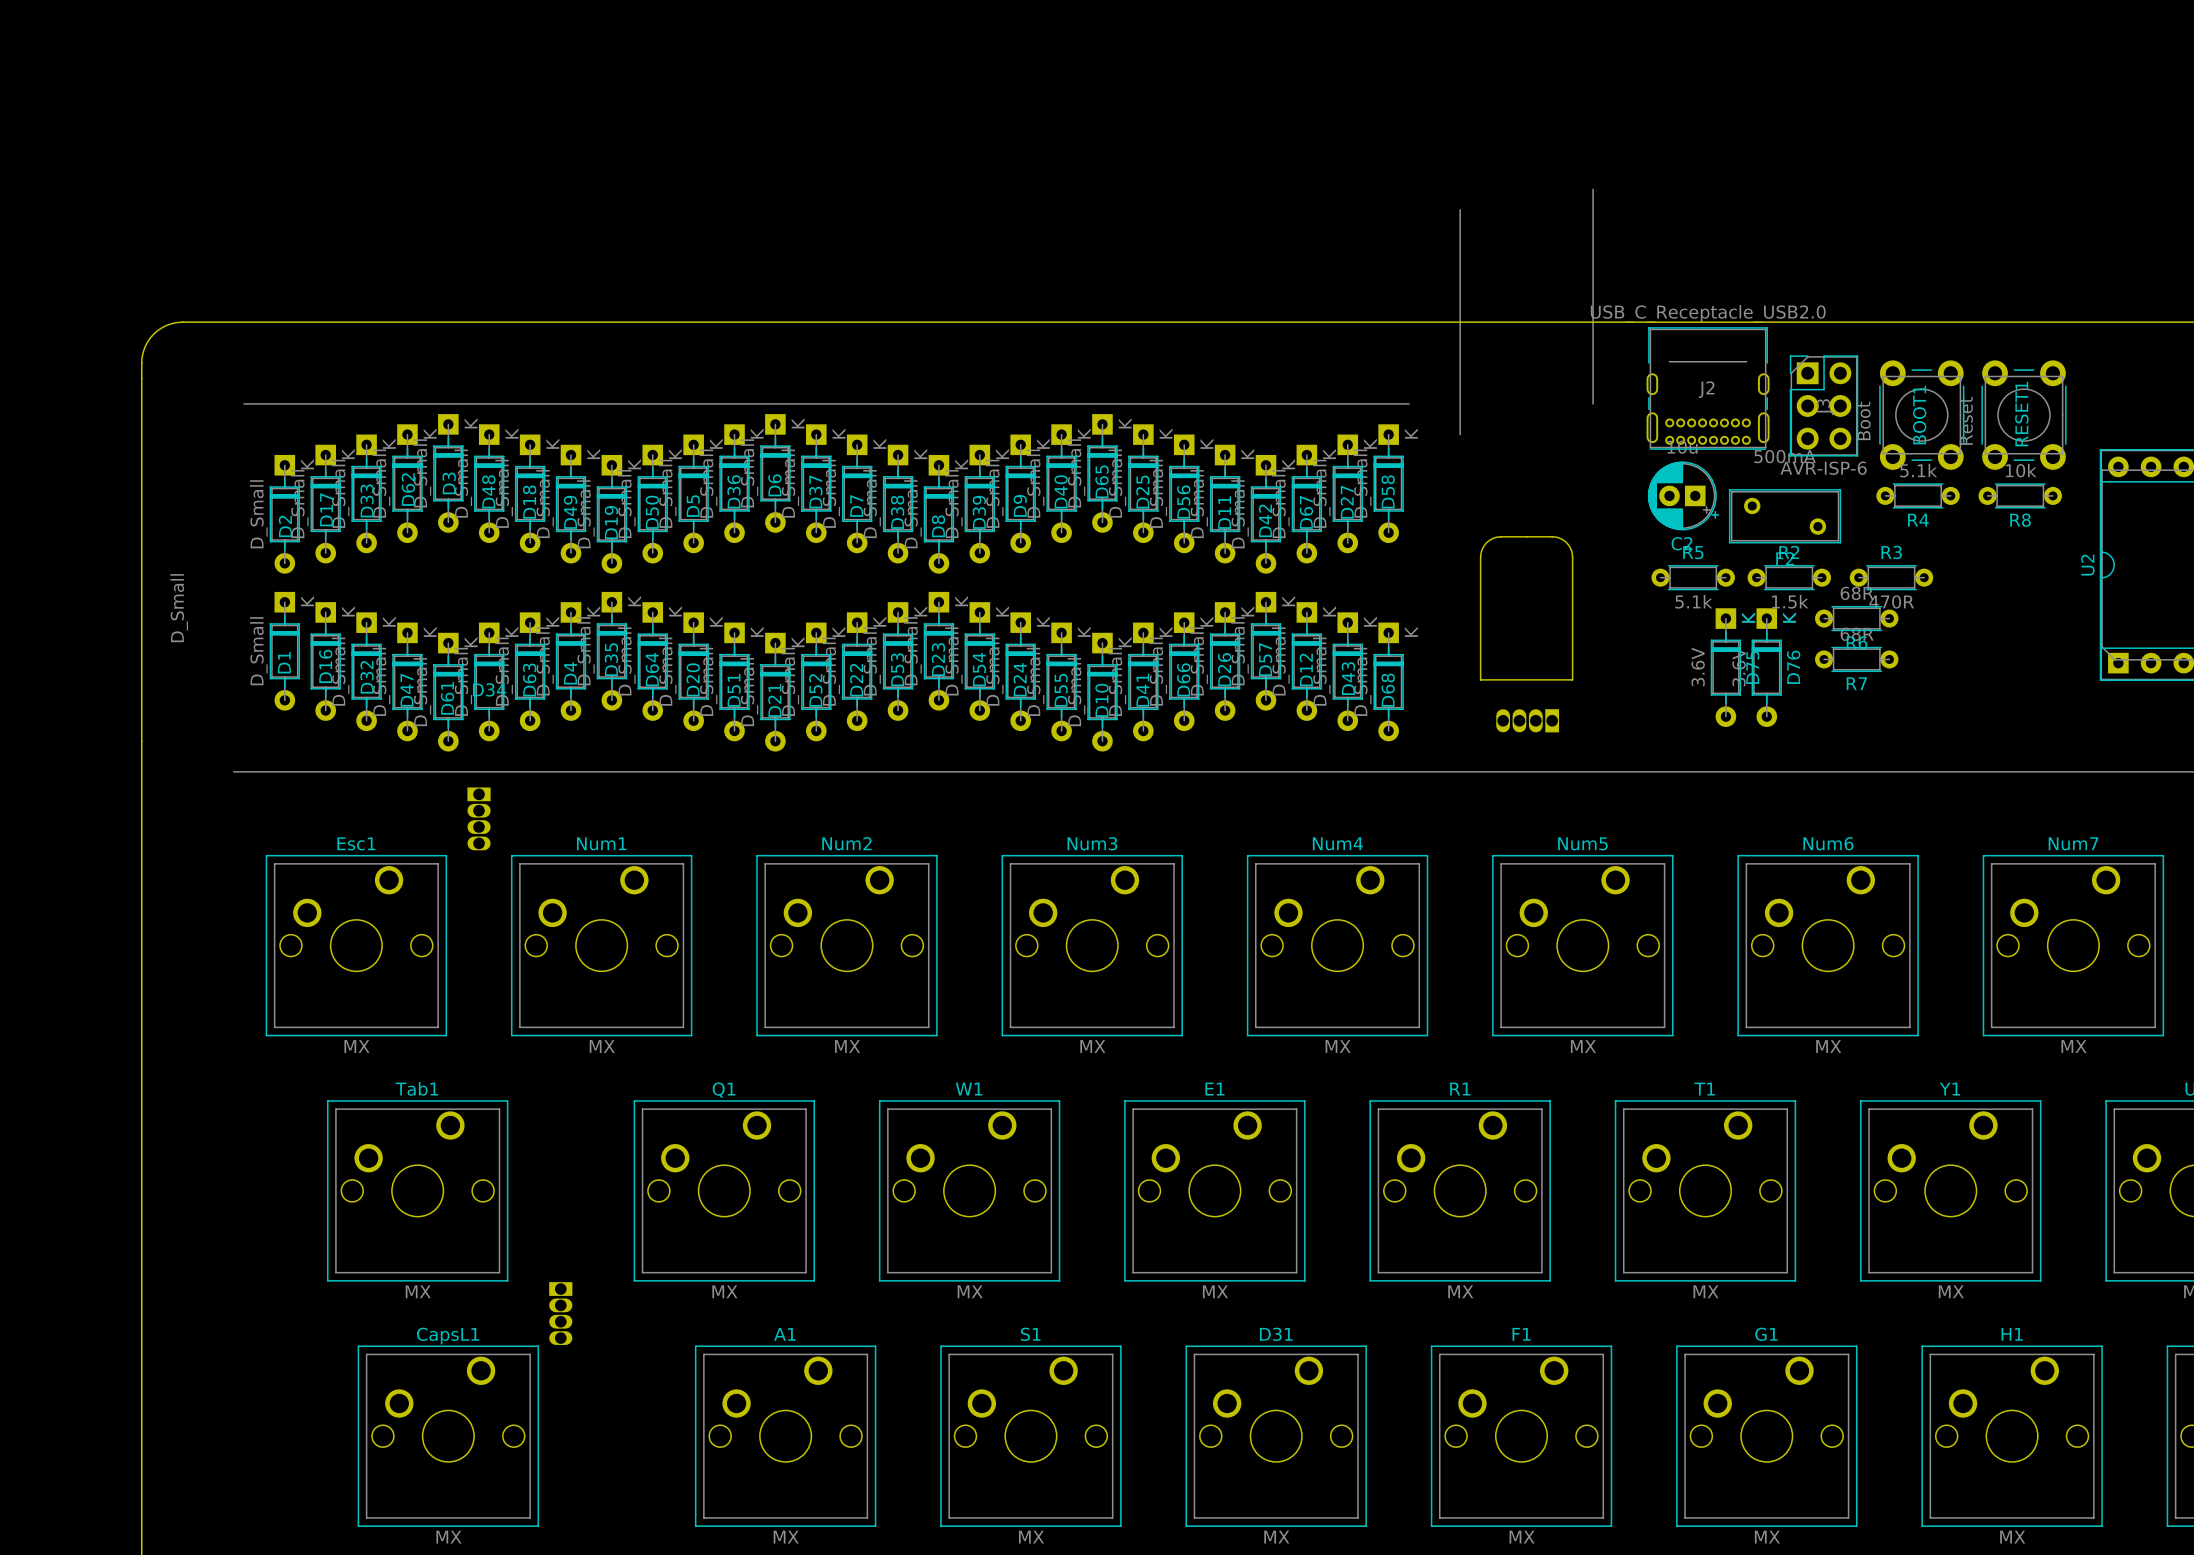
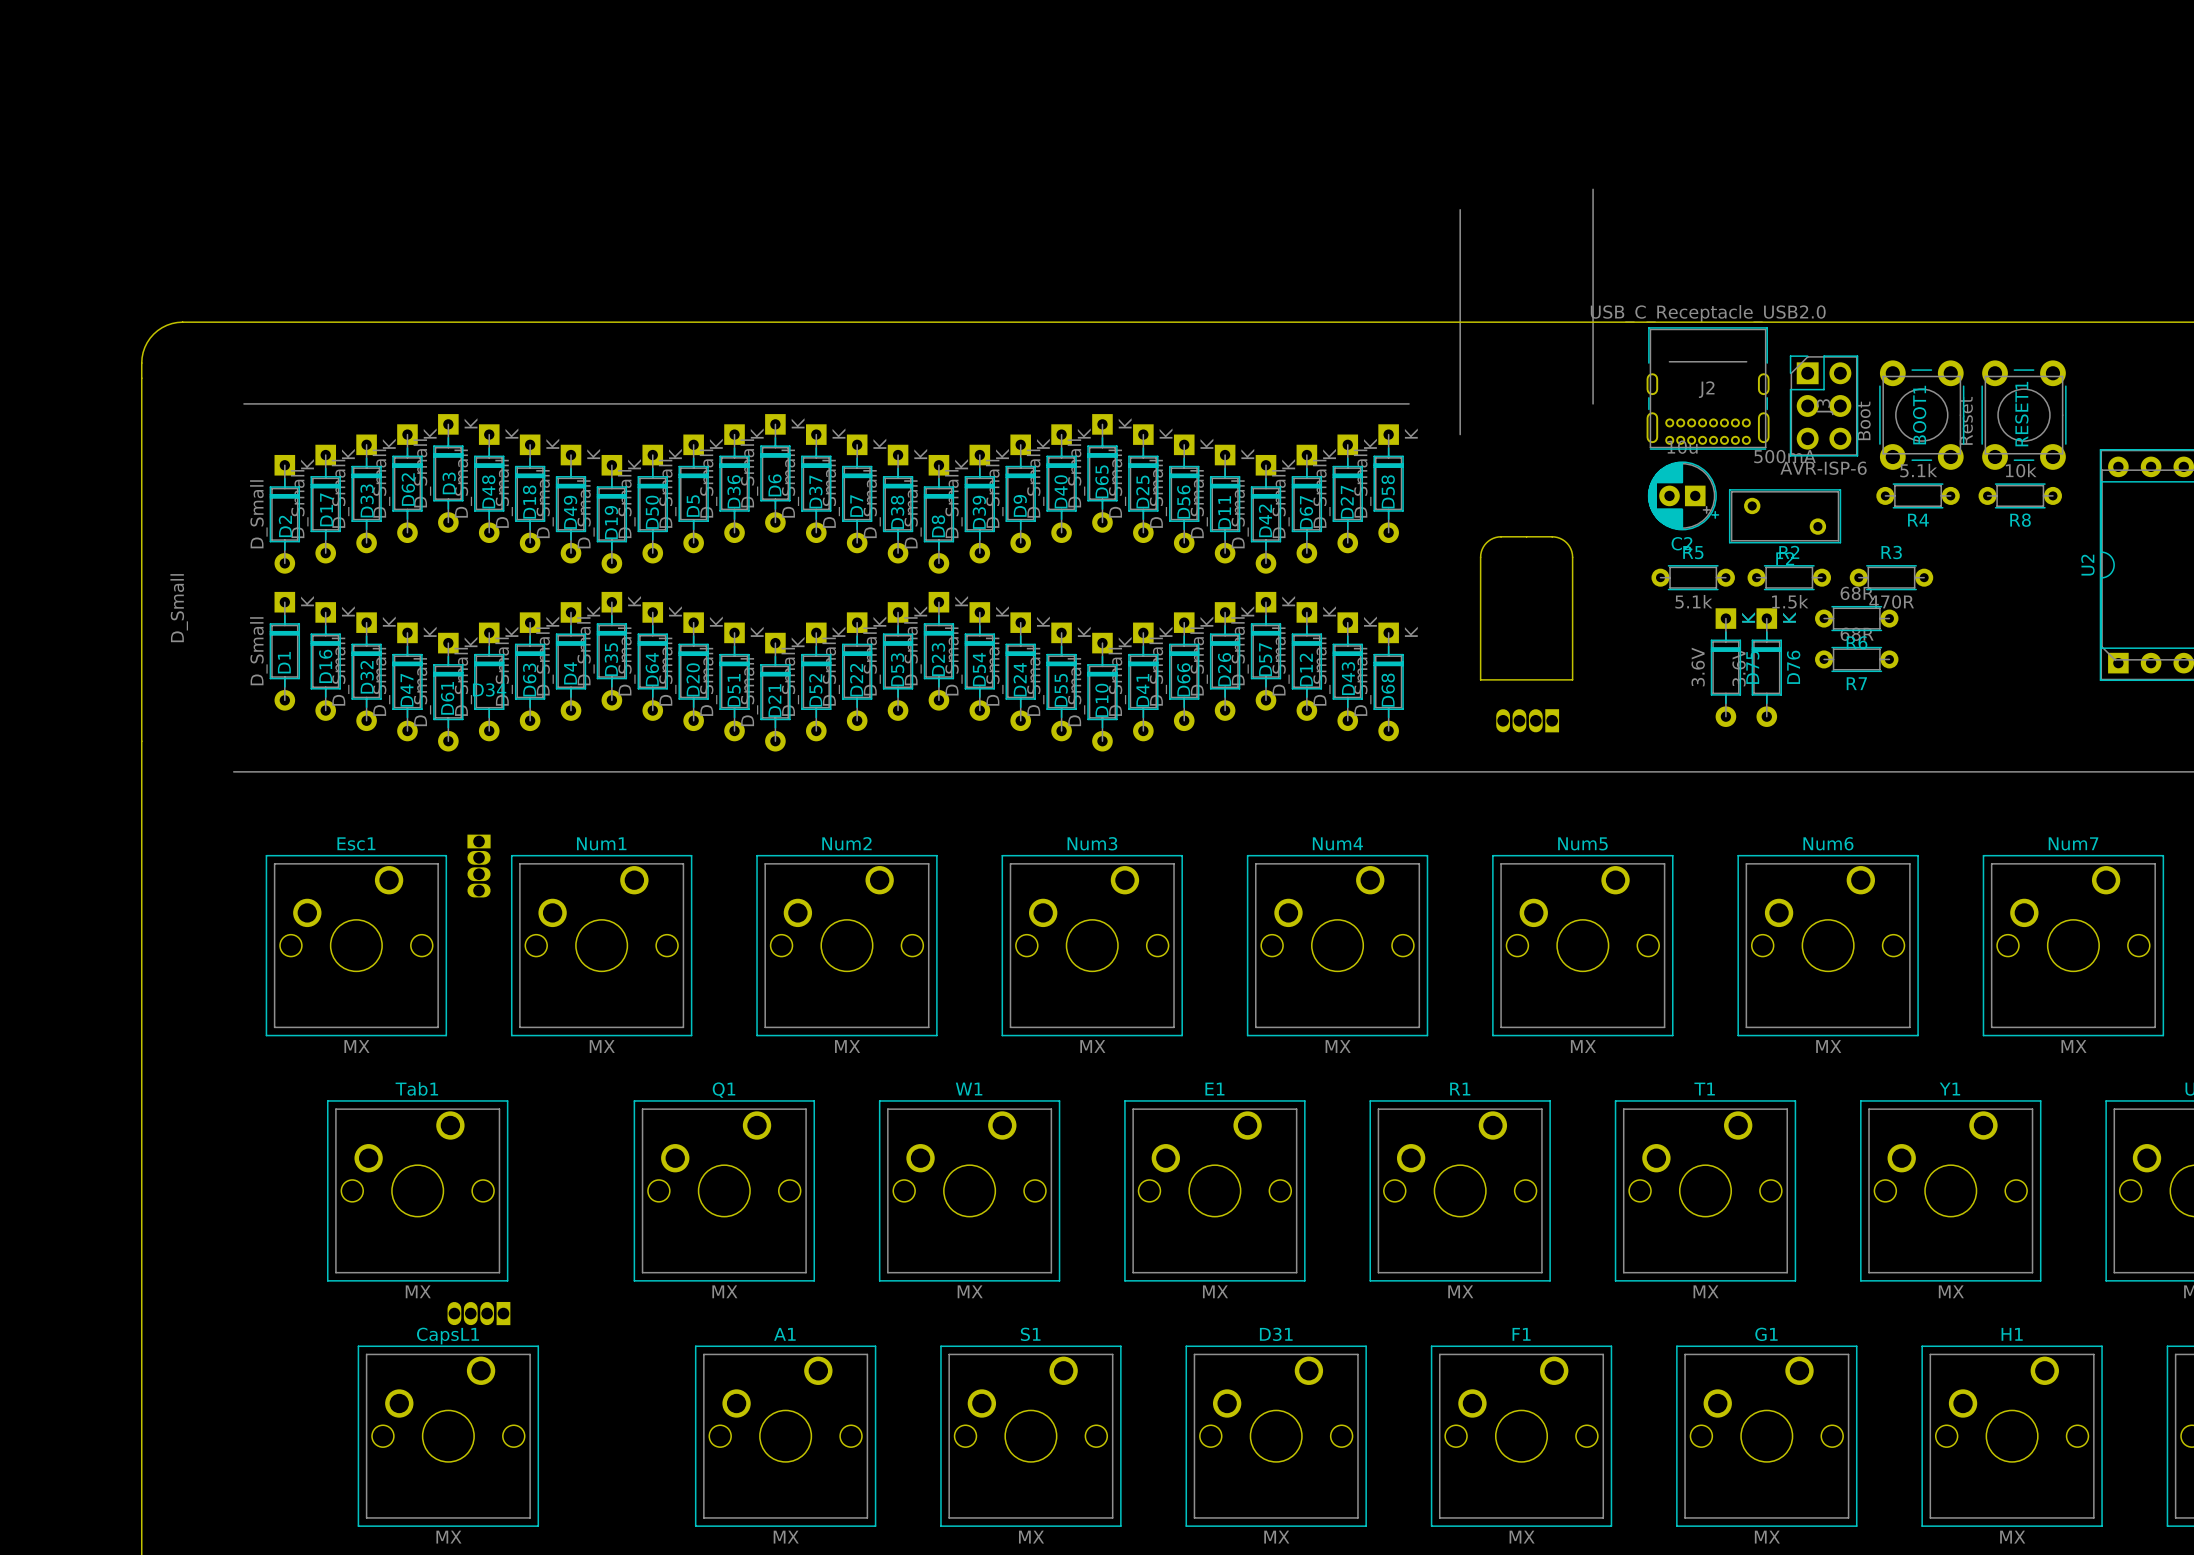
part position: (479, 818) -> (479, 866)
part rotation: 0° (560, 1313) -> 90° clockwise (478, 1313)
part position: (560, 1313) -> (478, 1313)

